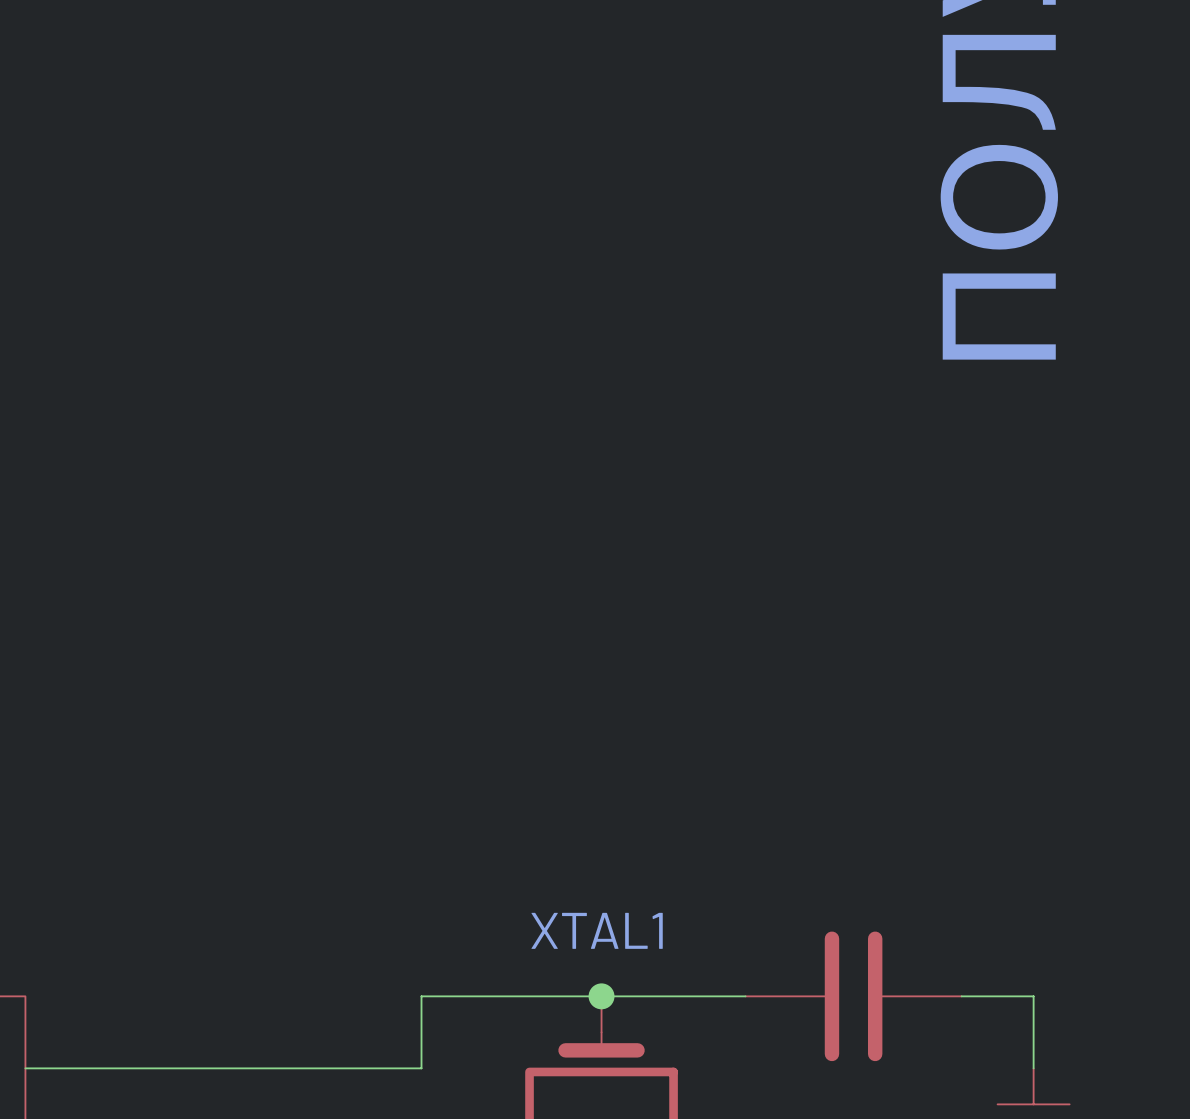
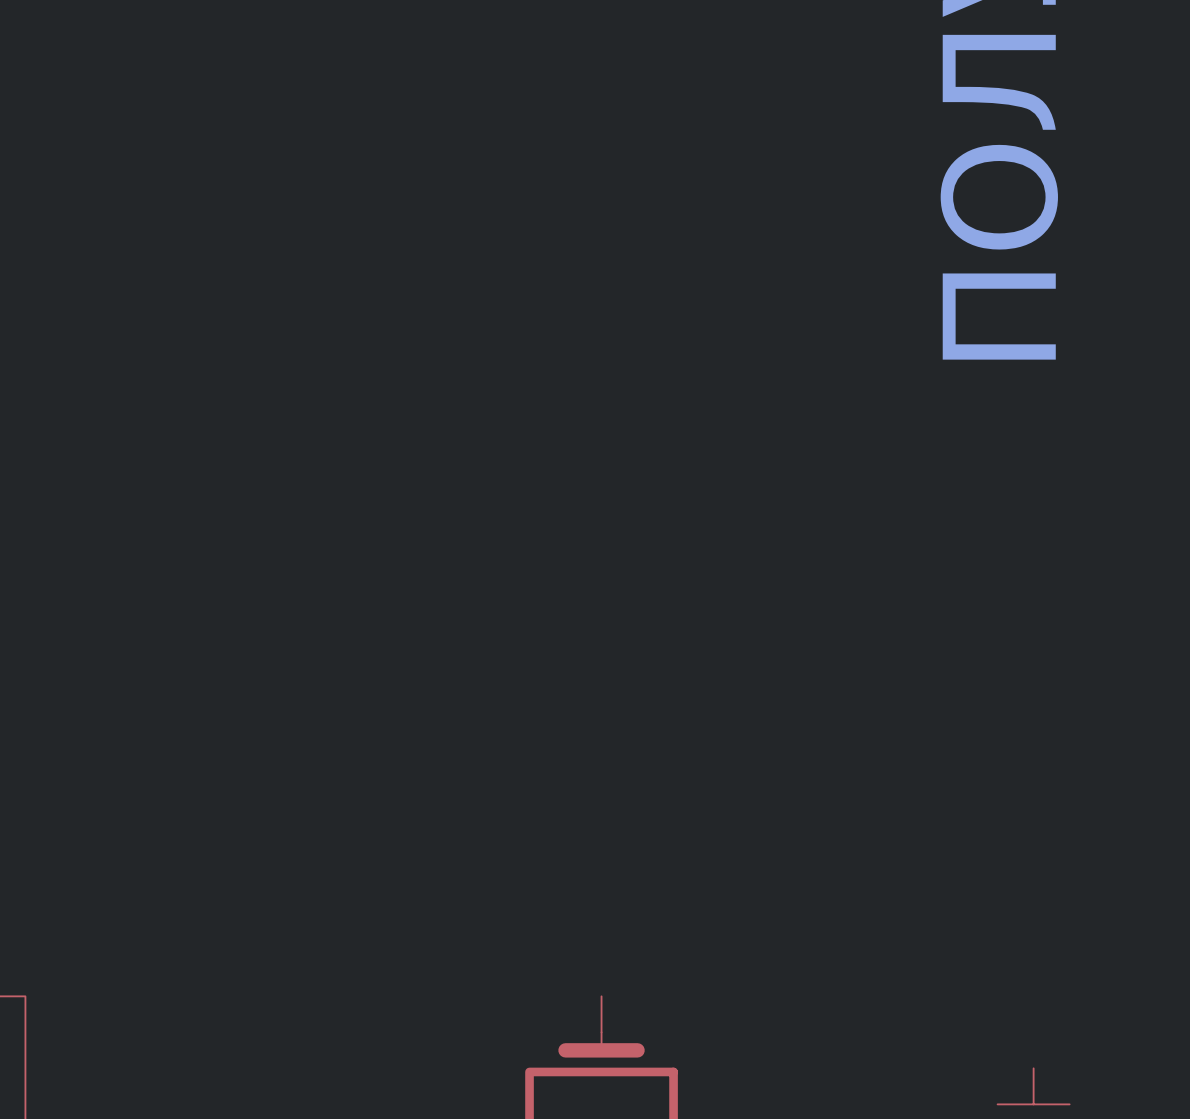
text: XTAL1 (597, 930) -> none
junction: (601, 996) -> none
wire: (745, 996) (421, 996) (421, 1068) (25, 1068) -> none
part: (853, 996) -> none
wire: (961, 996) (1033, 996) (1033, 1068) -> none

